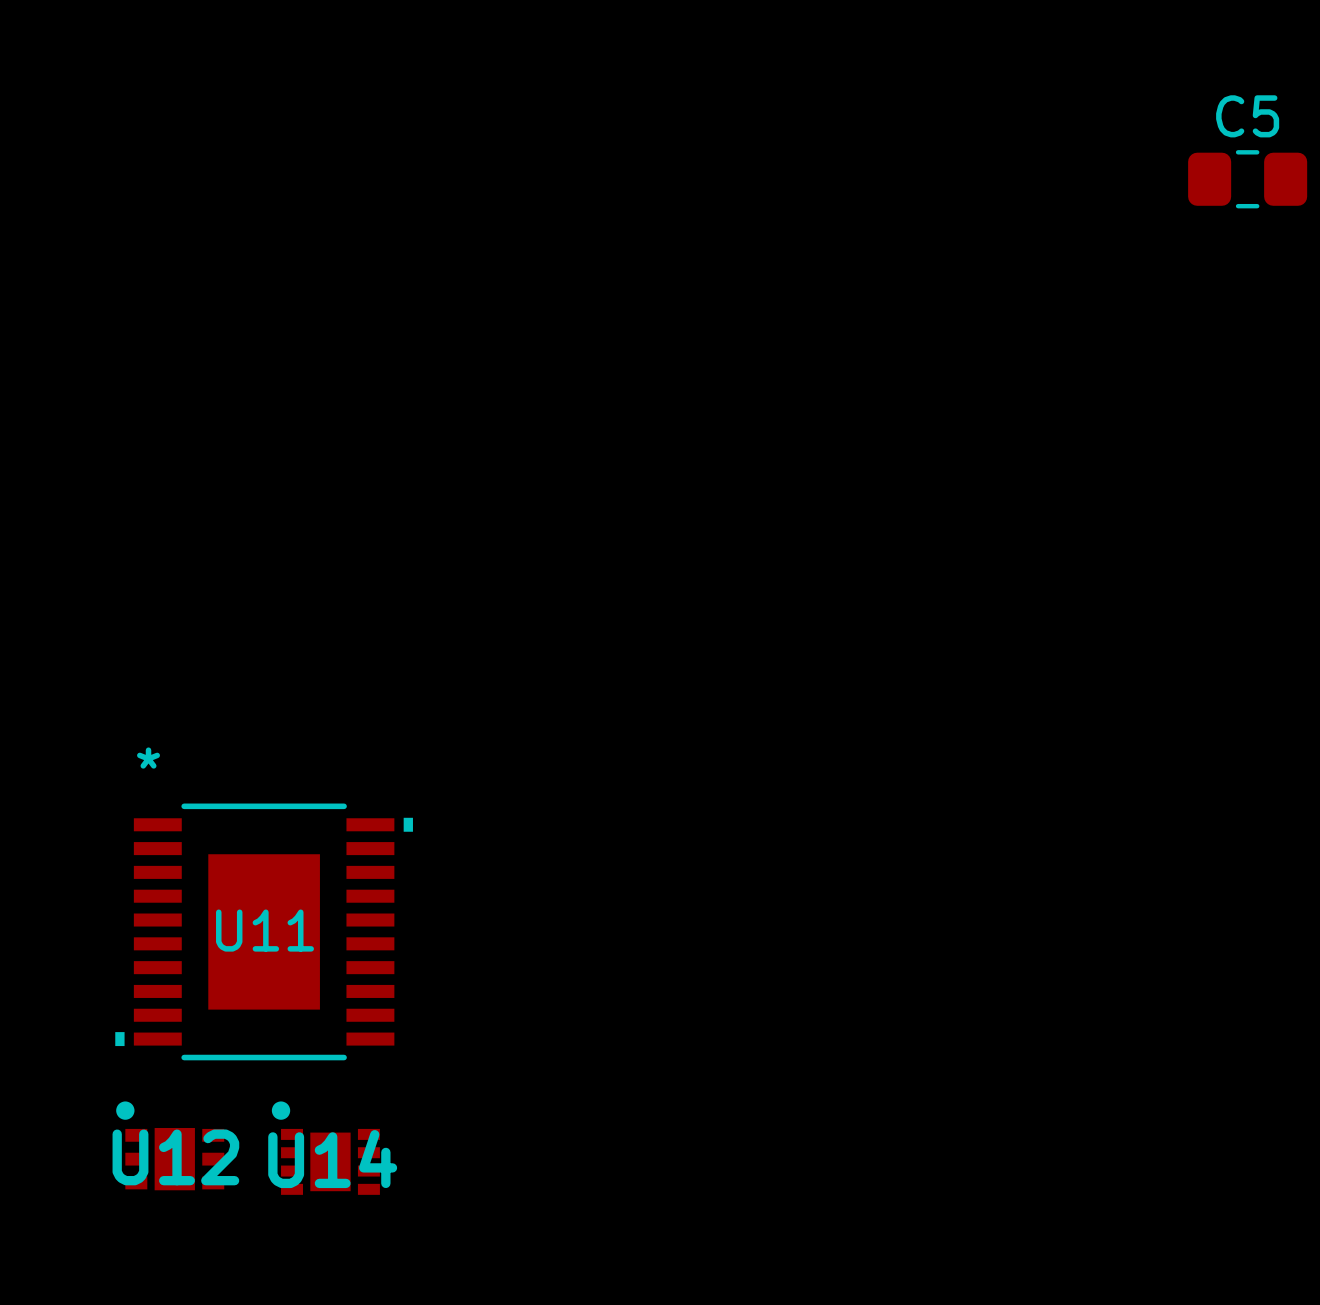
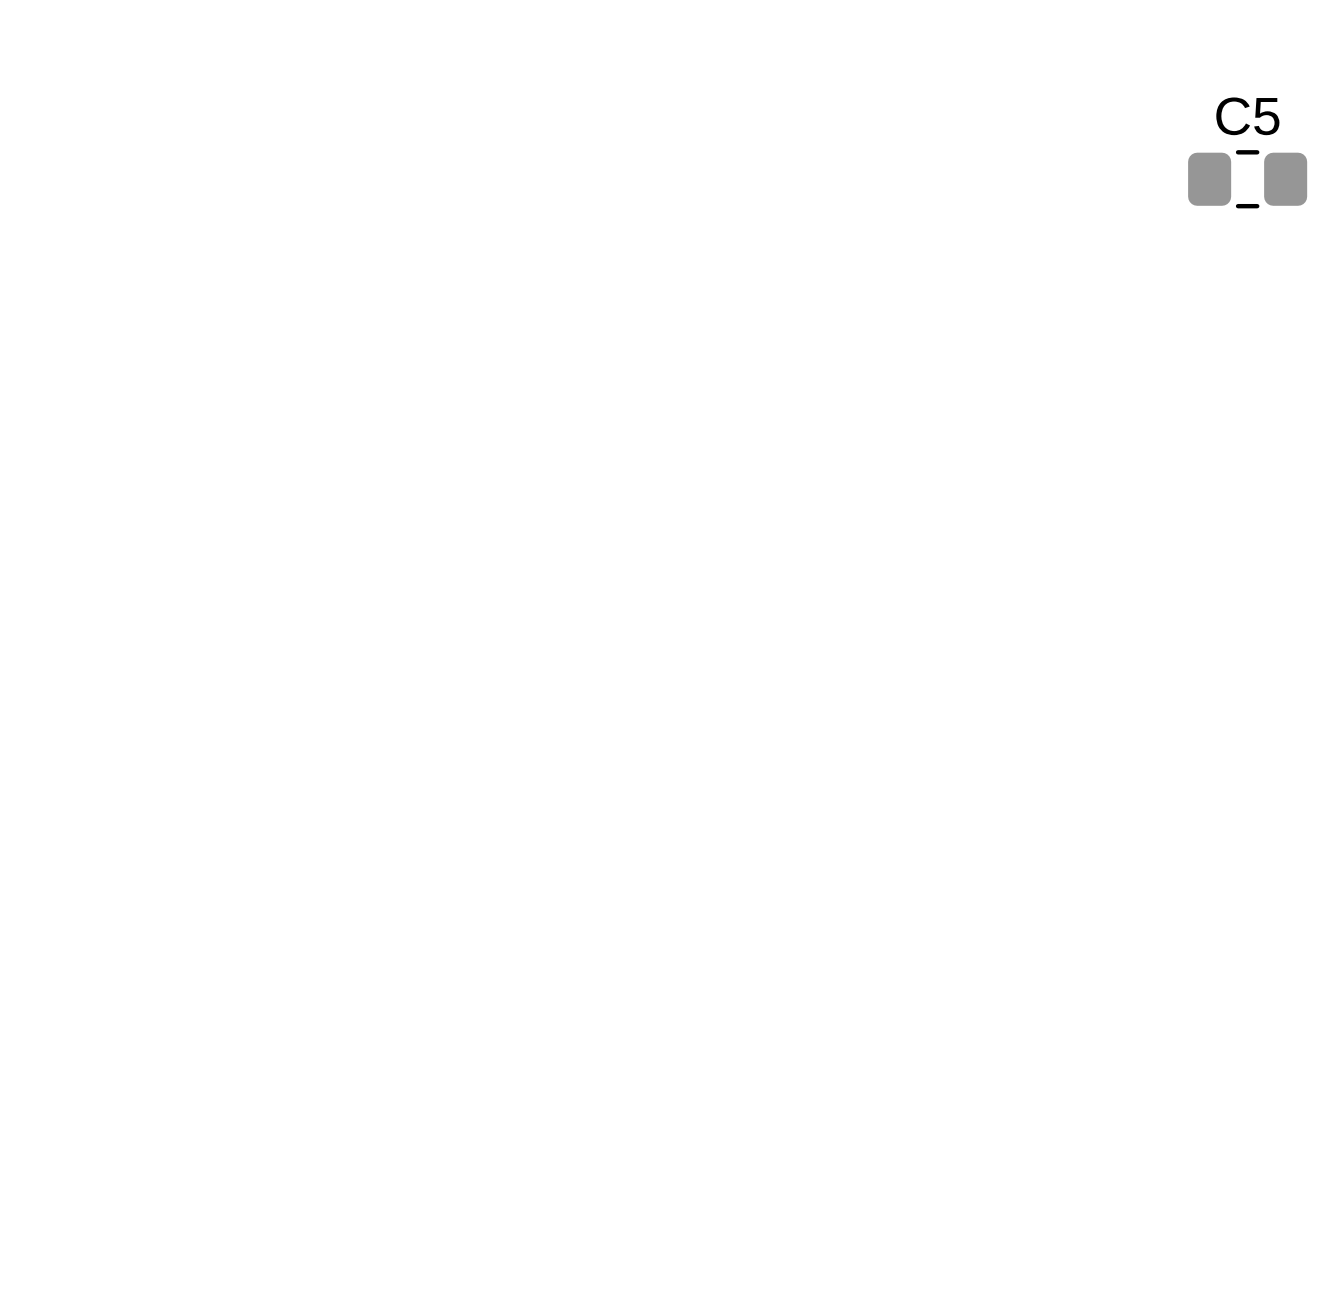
U11: (264, 931) -> none
U12: (170, 1145) -> none
U14: (325, 1148) -> none

